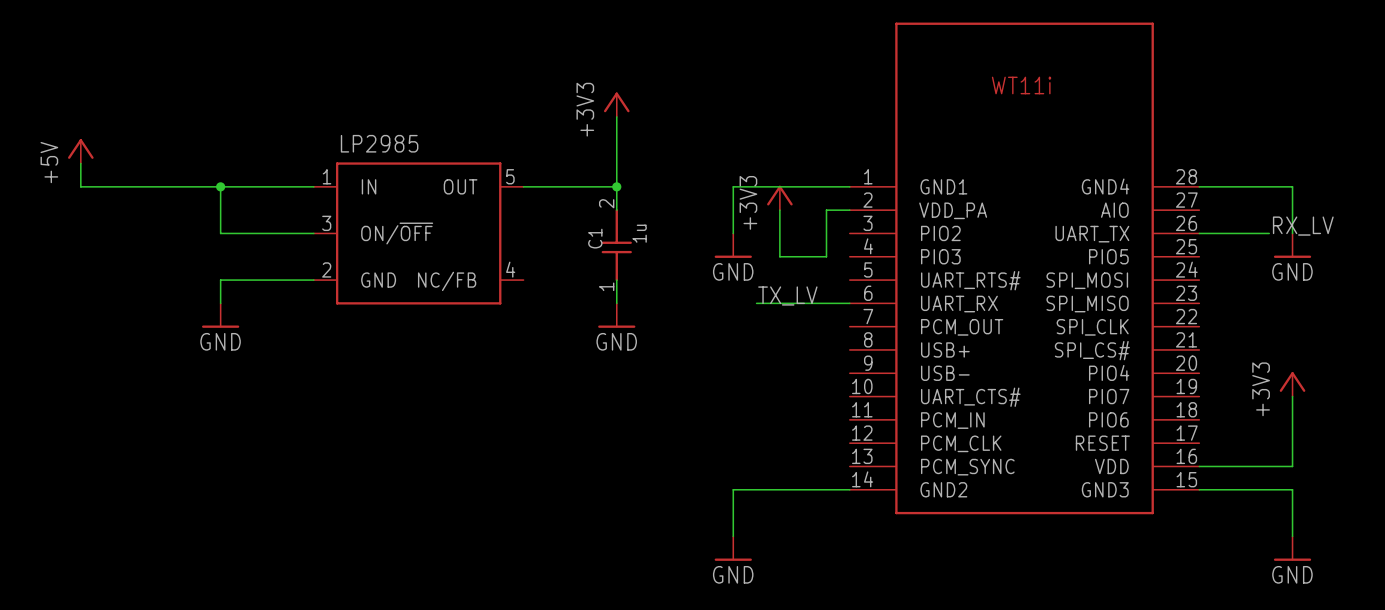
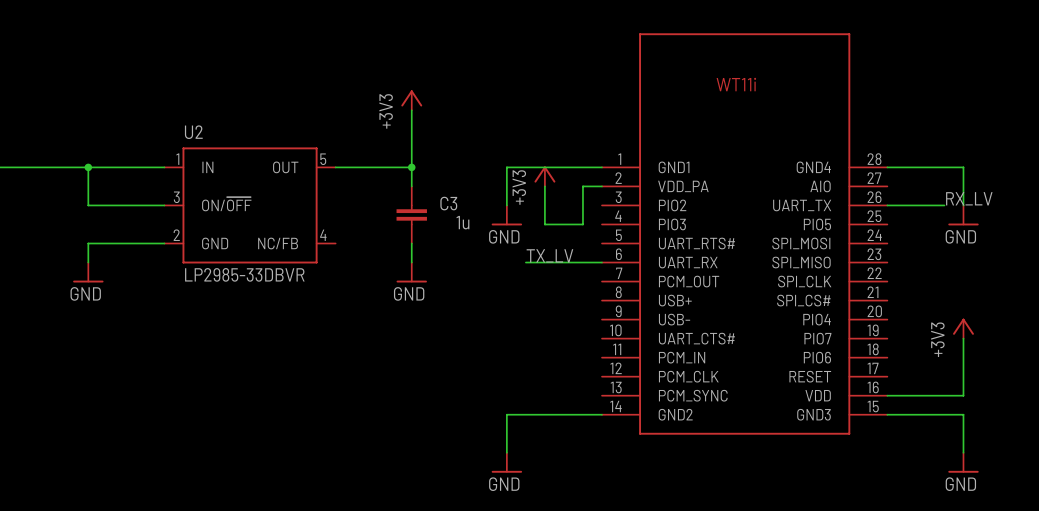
LP2985 name: LP2985 (379, 143) -> U2 (193, 132)
C1: 1u (616, 245) -> none
C3: none -> 1u (411, 214)
LP2985 value: none -> LP2985-33DBVR (244, 274)

